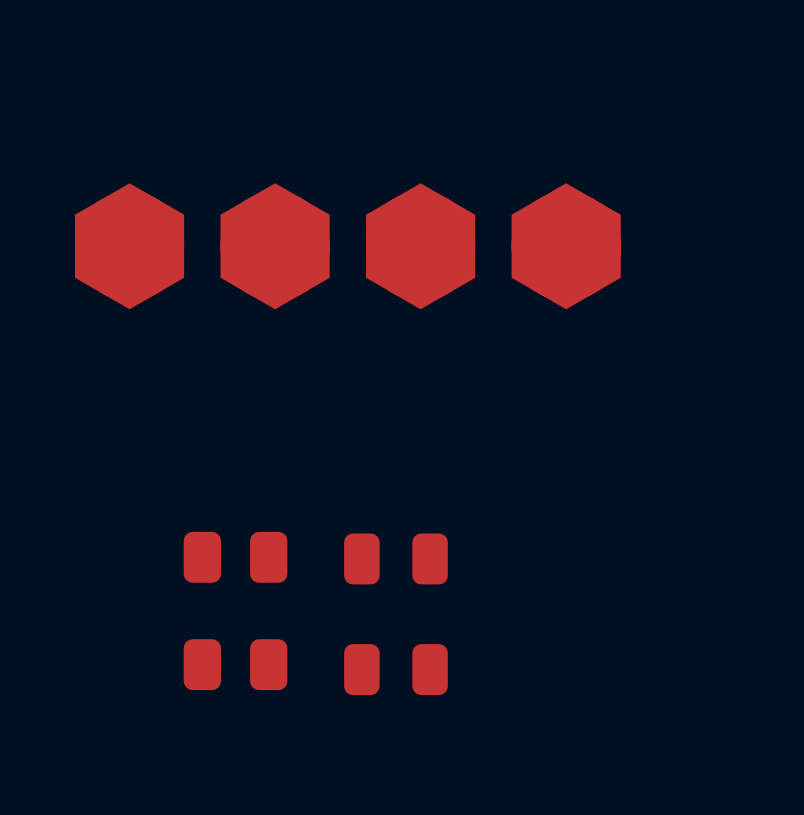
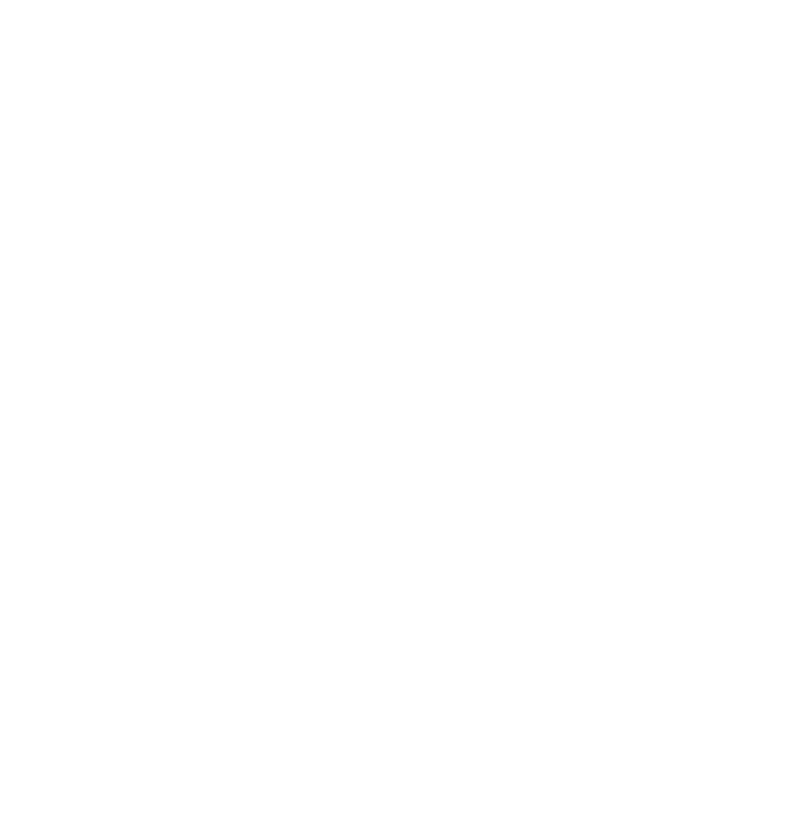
part: (129, 246) -> none
part: (275, 246) -> none
part: (420, 246) -> none
part: (566, 246) -> none
part: (235, 557) -> none
part: (395, 558) -> none
part: (235, 664) -> none
part: (395, 669) -> none

